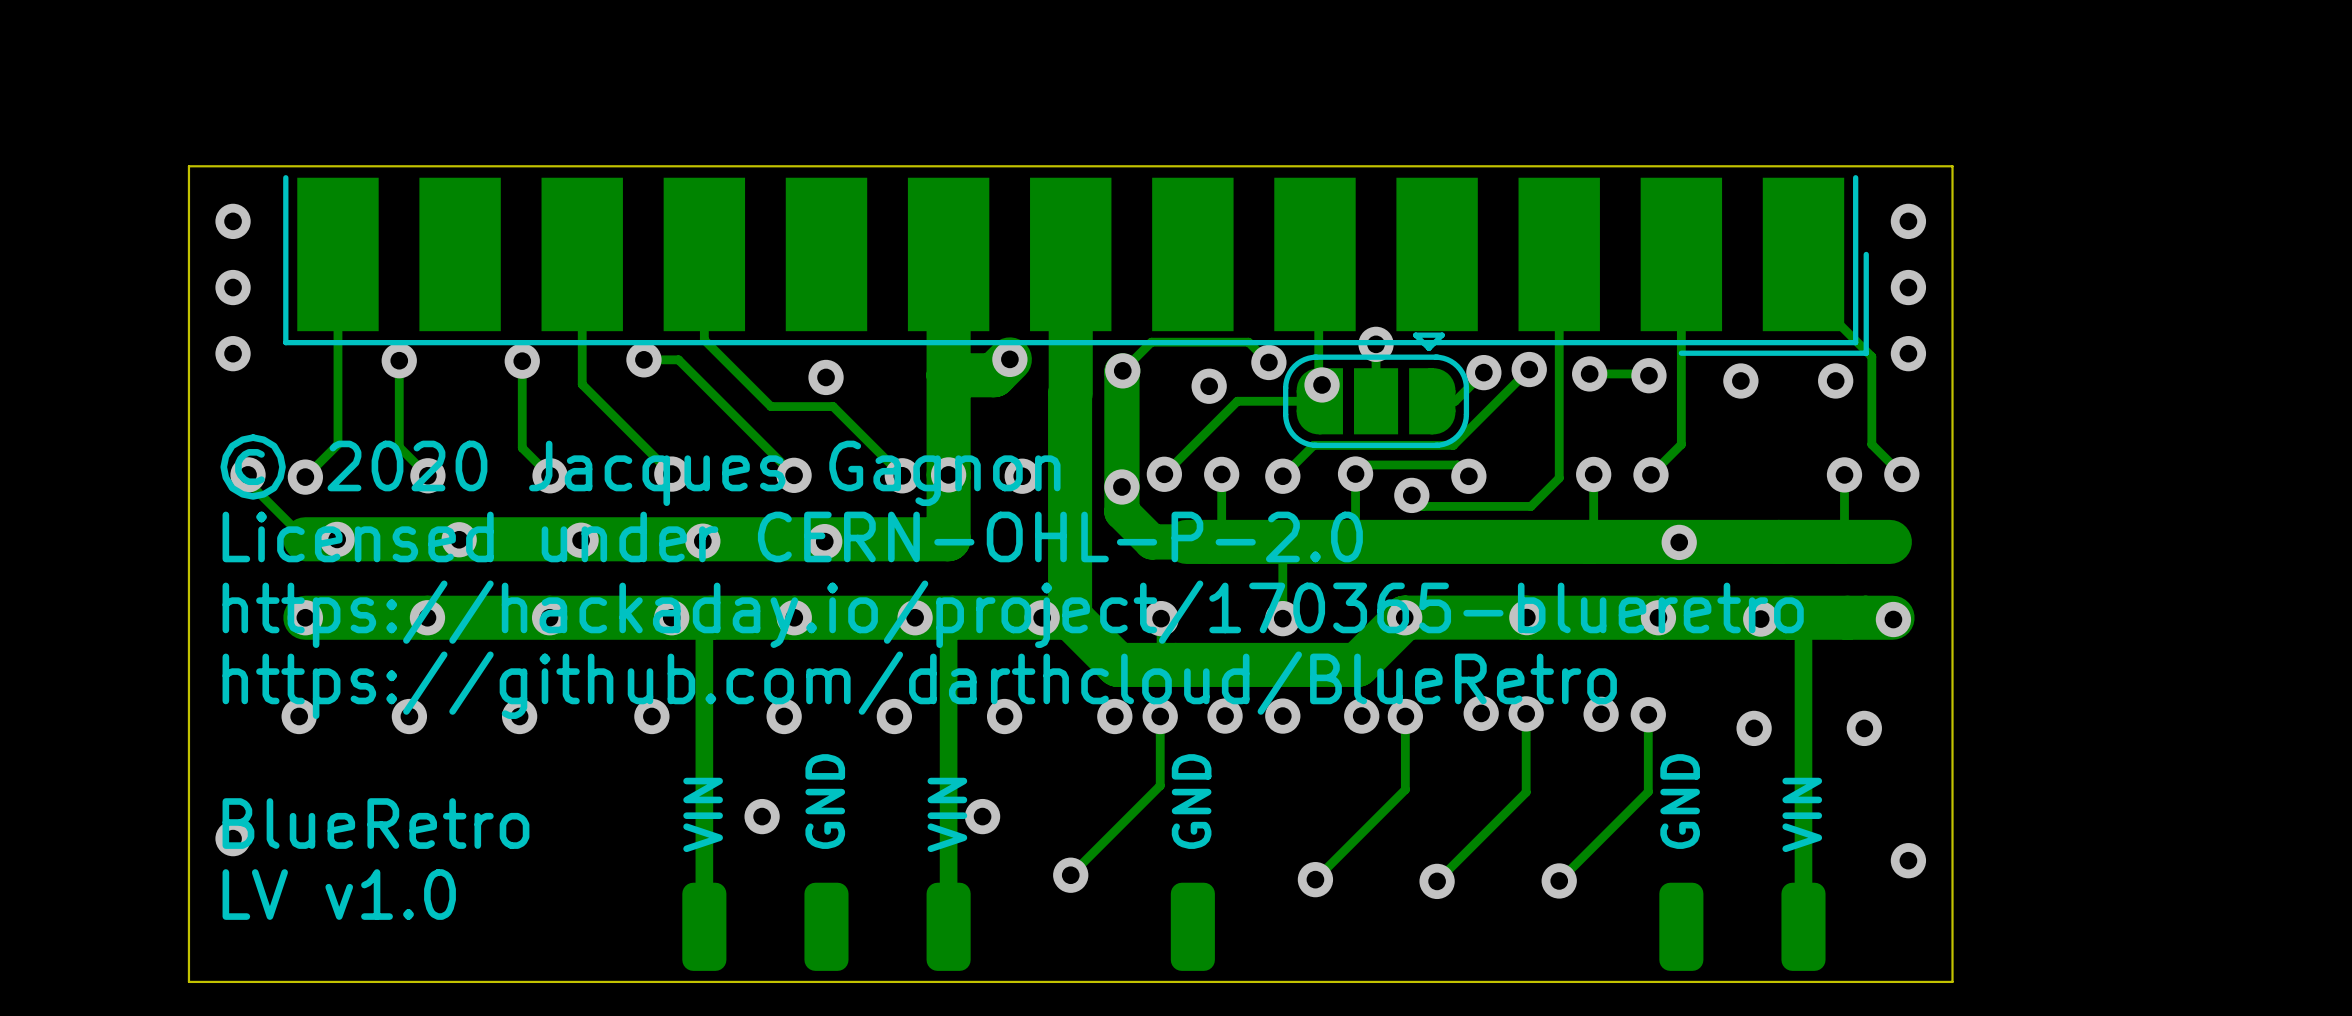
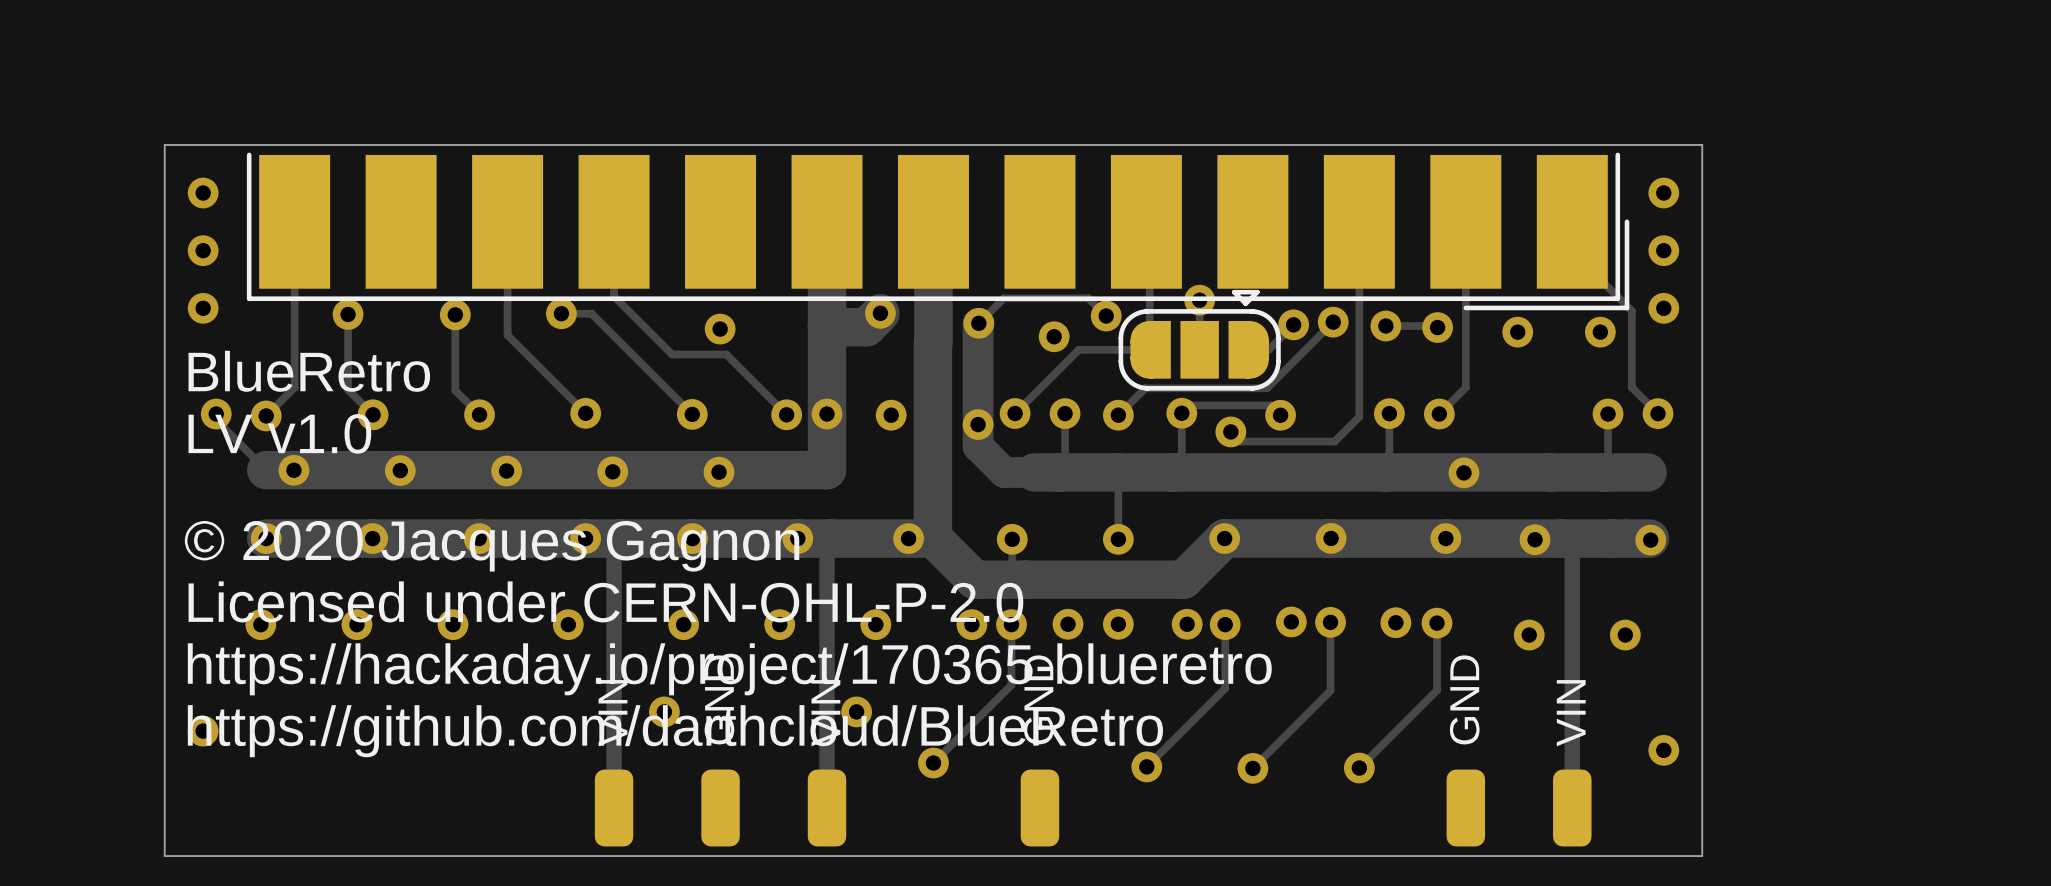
via: (1322, 384) -> none
text: none -> BlueRetro (309, 371)
text: © 2020 Jacques Gagnon (640, 470) -> none
text: Licensed under CERN-OHL-P-2.0 (792, 536) -> none
text: https://hackaday.io/project/170365-blueretro (1013, 614) -> © 2020 Jacques Gagnon (492, 546)
text: https://github.com/darthcloud/BlueRetro (919, 685) -> Licensed under CERN-OHL-P-2.0 (605, 601)
text: none -> https://hackaday.io/project/170365-blueretro (729, 669)
text: BlueRetro (375, 823) -> https://github.com/darthcloud/BlueRetro (675, 731)
text position: LV v1.0 (339, 894) -> LV v1.0 (279, 433)

